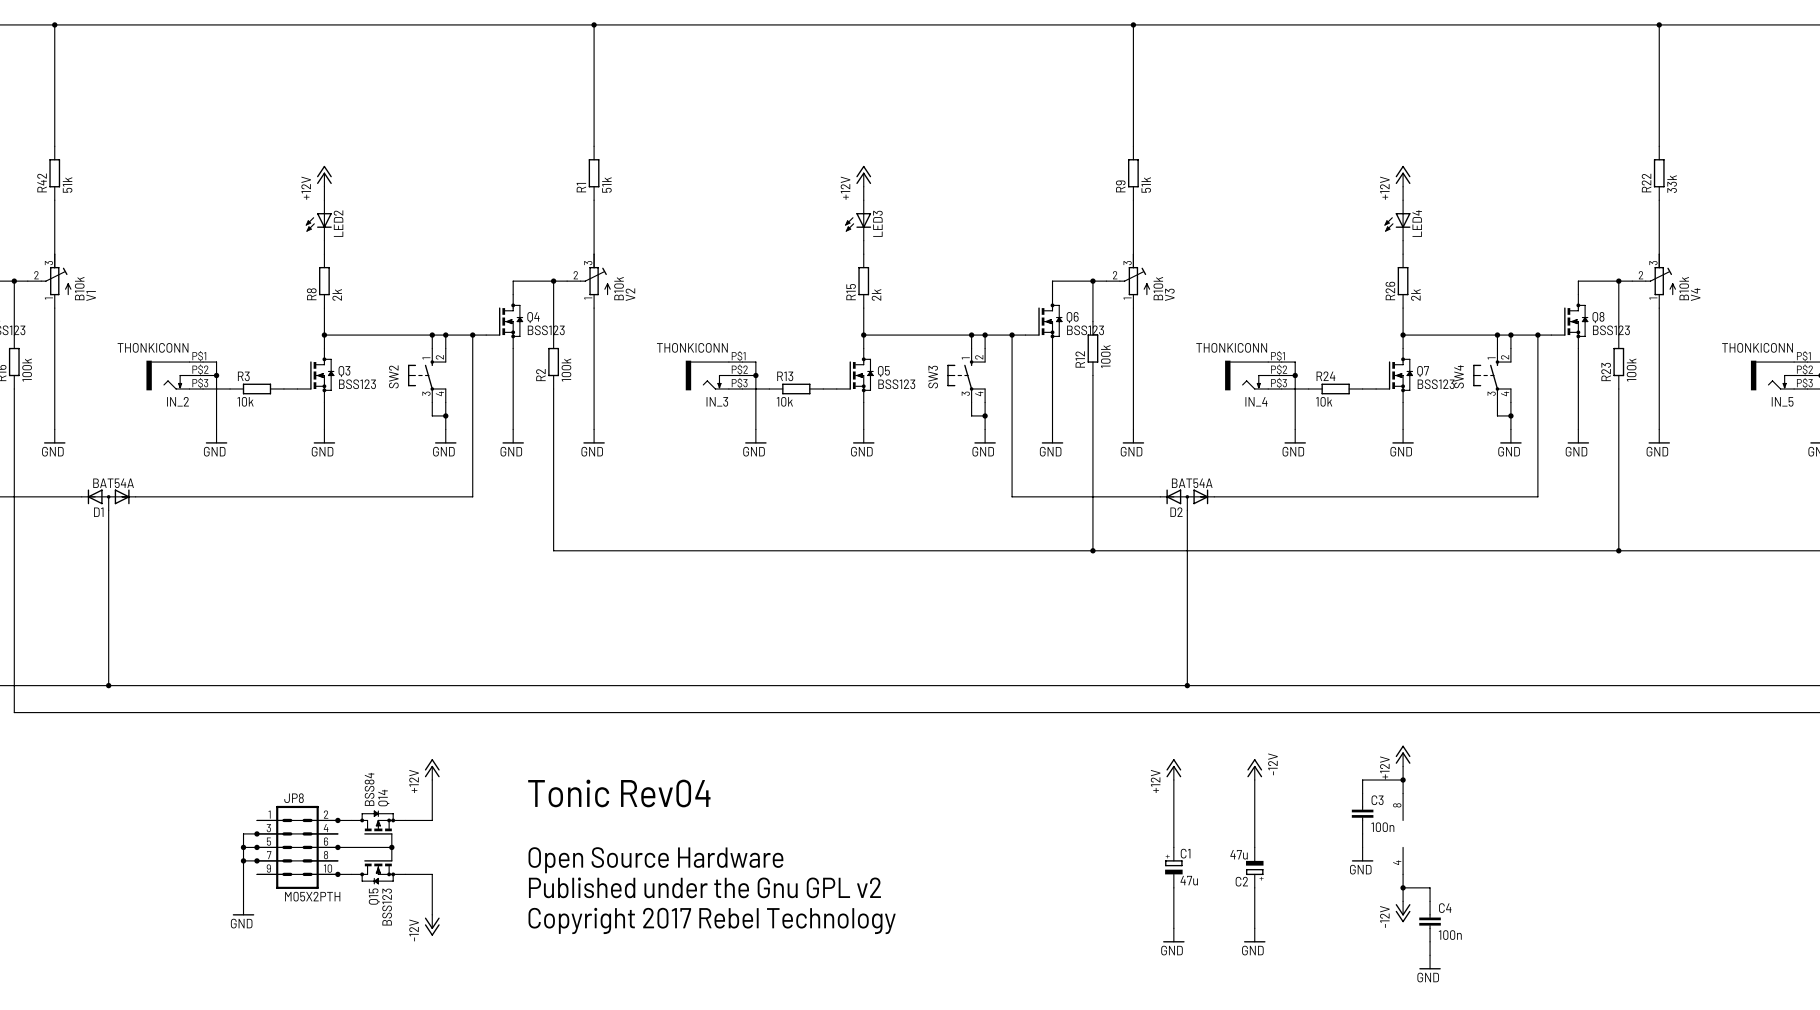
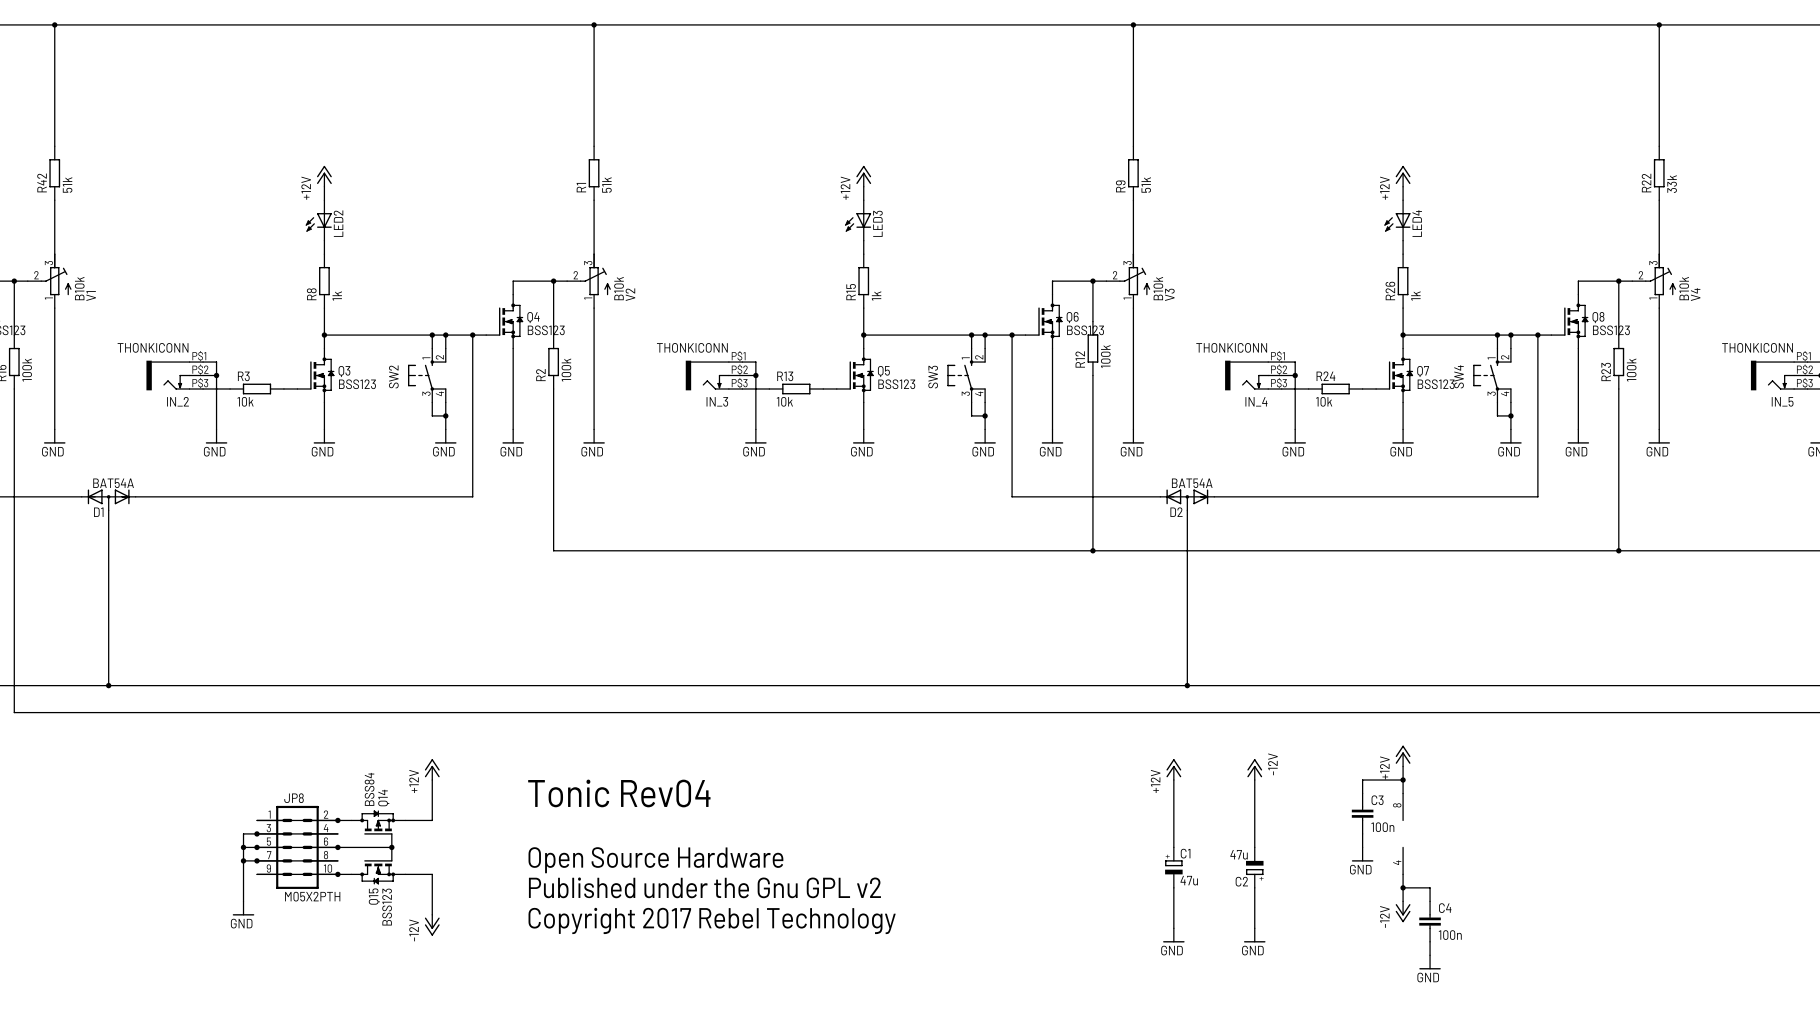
R8 value: 2k (337, 294) -> 1k (337, 296)
R15 value: 2k (876, 294) -> 1k (876, 296)
R26 value: 2k (1415, 294) -> 1k (1415, 296)

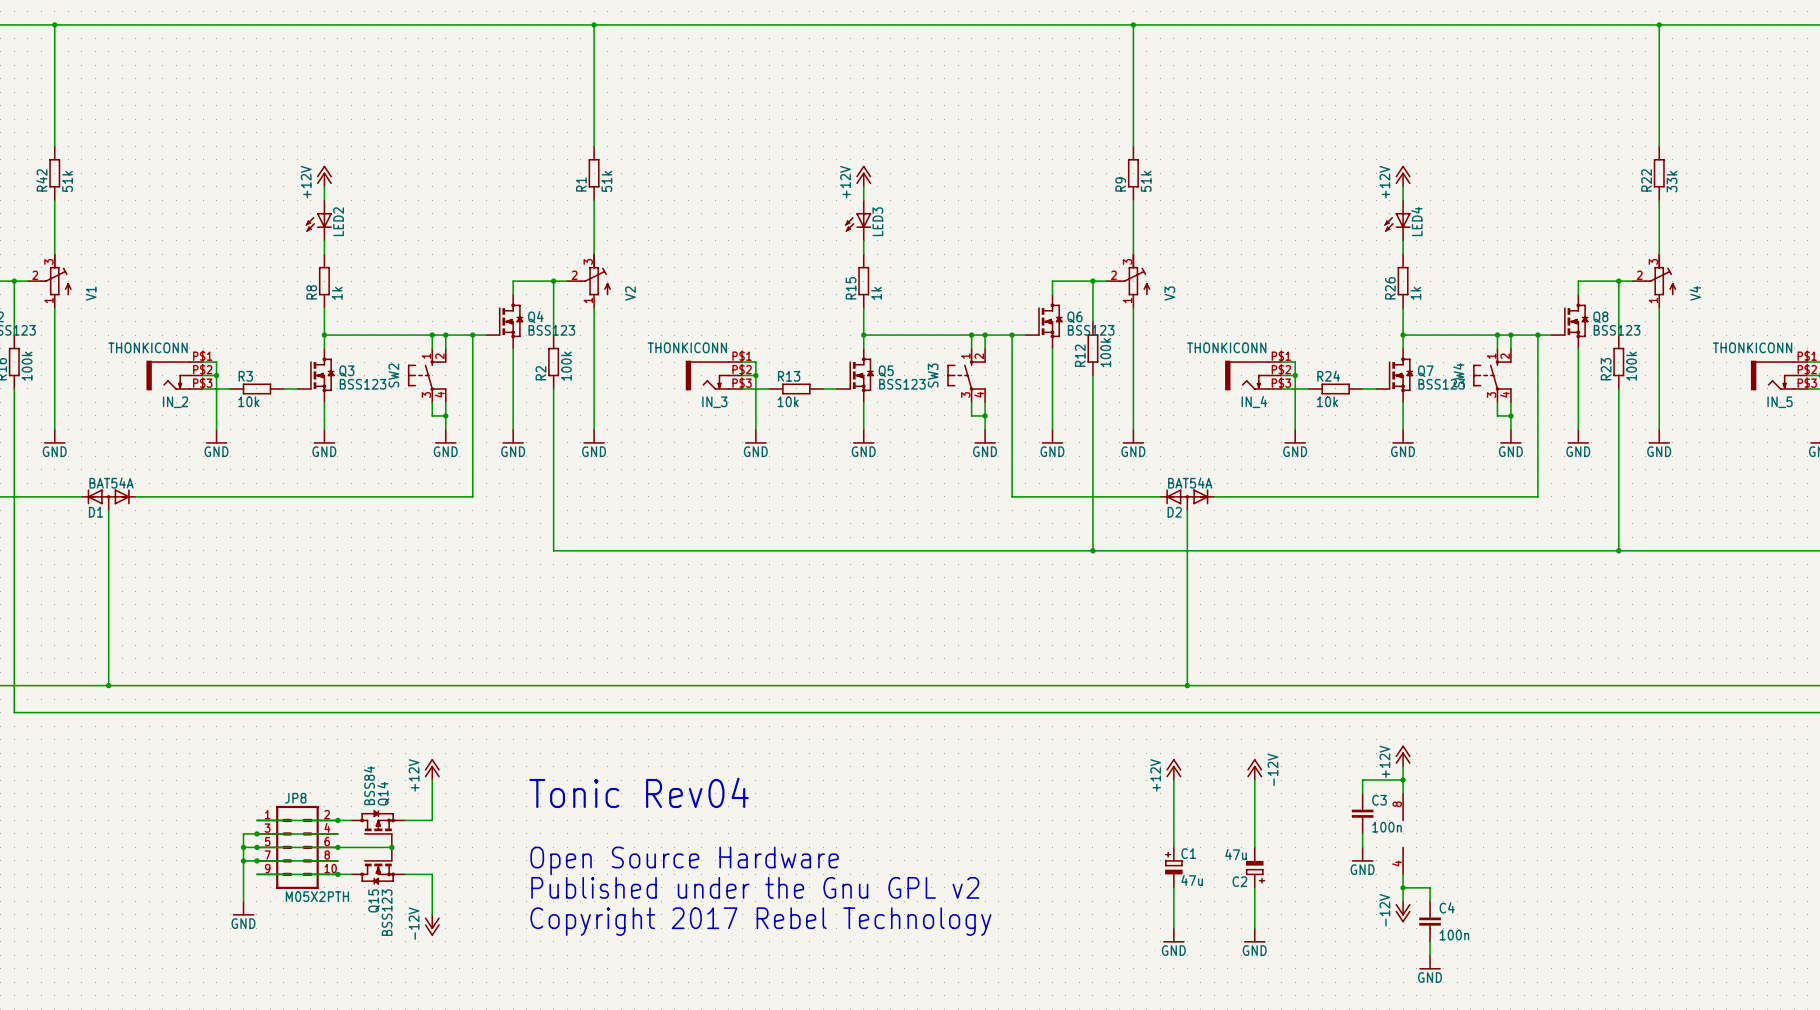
V1 value: B10k (79, 288) -> none
V2 value: B10k (619, 288) -> none
V3 value: B10k (1158, 288) -> none
V4 value: B10k (1684, 288) -> none

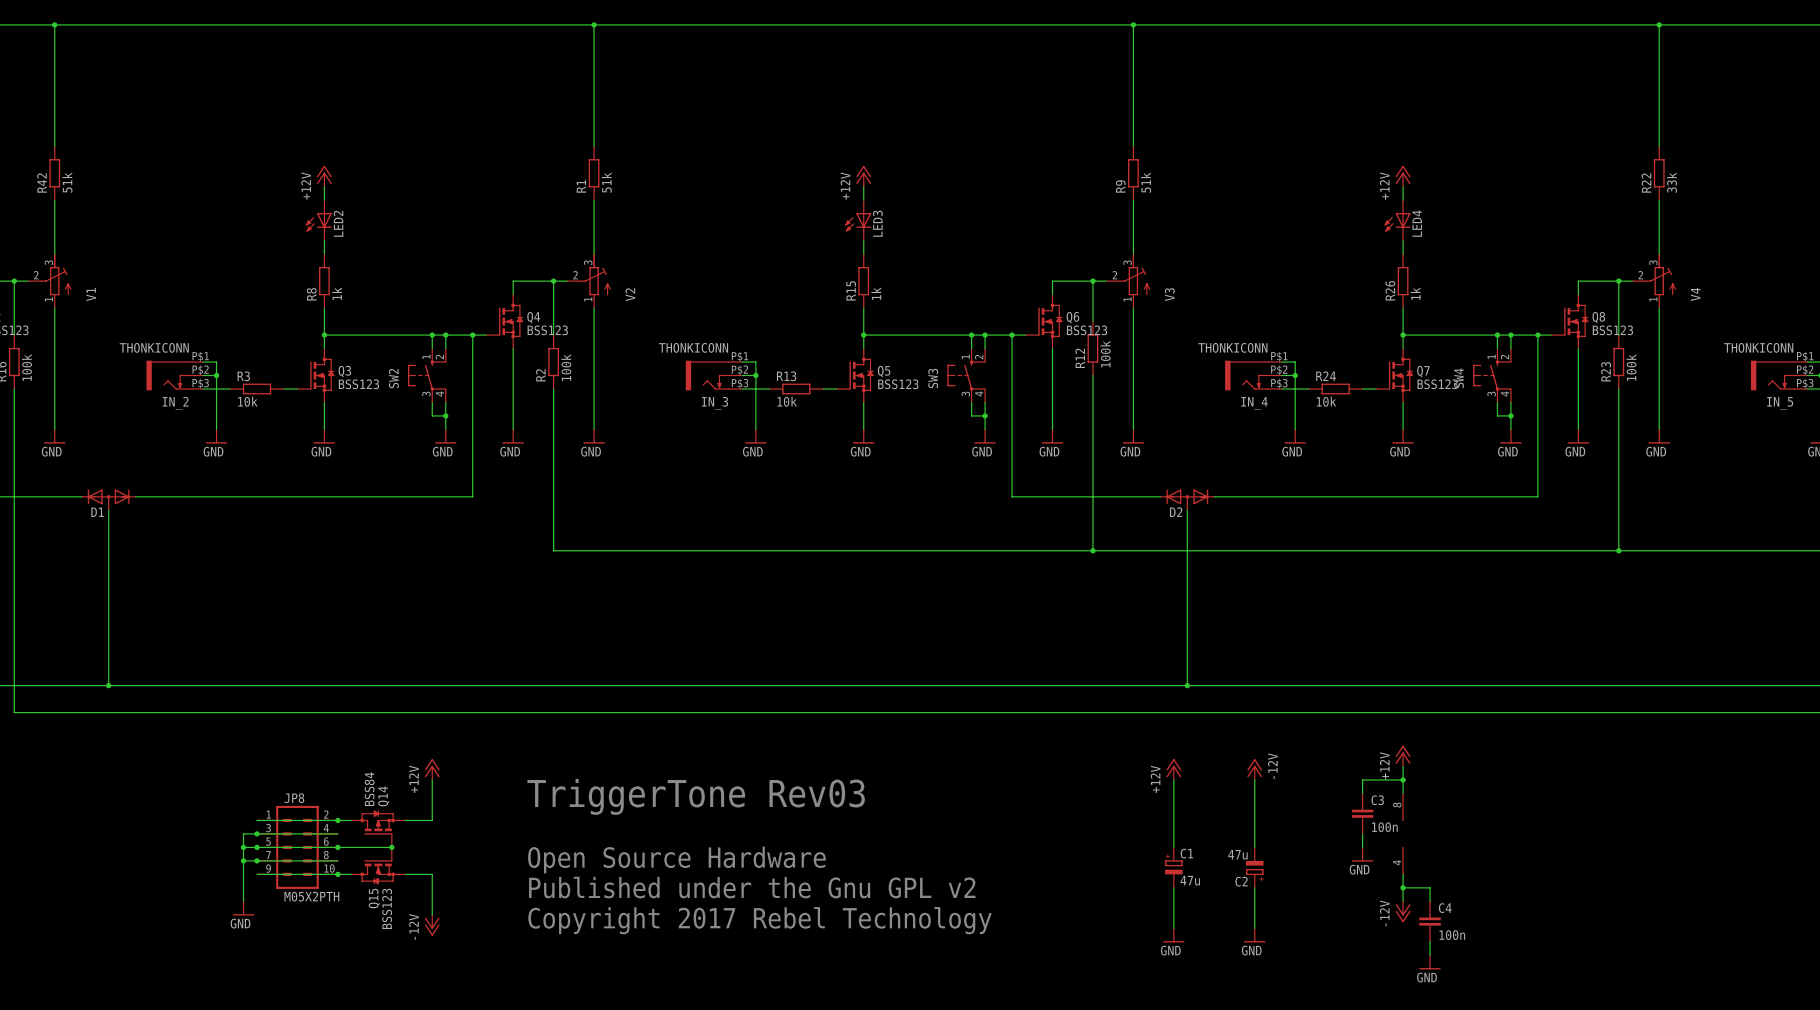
D1 value: BAT54A (111, 483) -> none
D2 value: BAT54A (1190, 483) -> none
text: Tonic Rev04 (639, 792) -> TriggerTone Rev03 (696, 796)

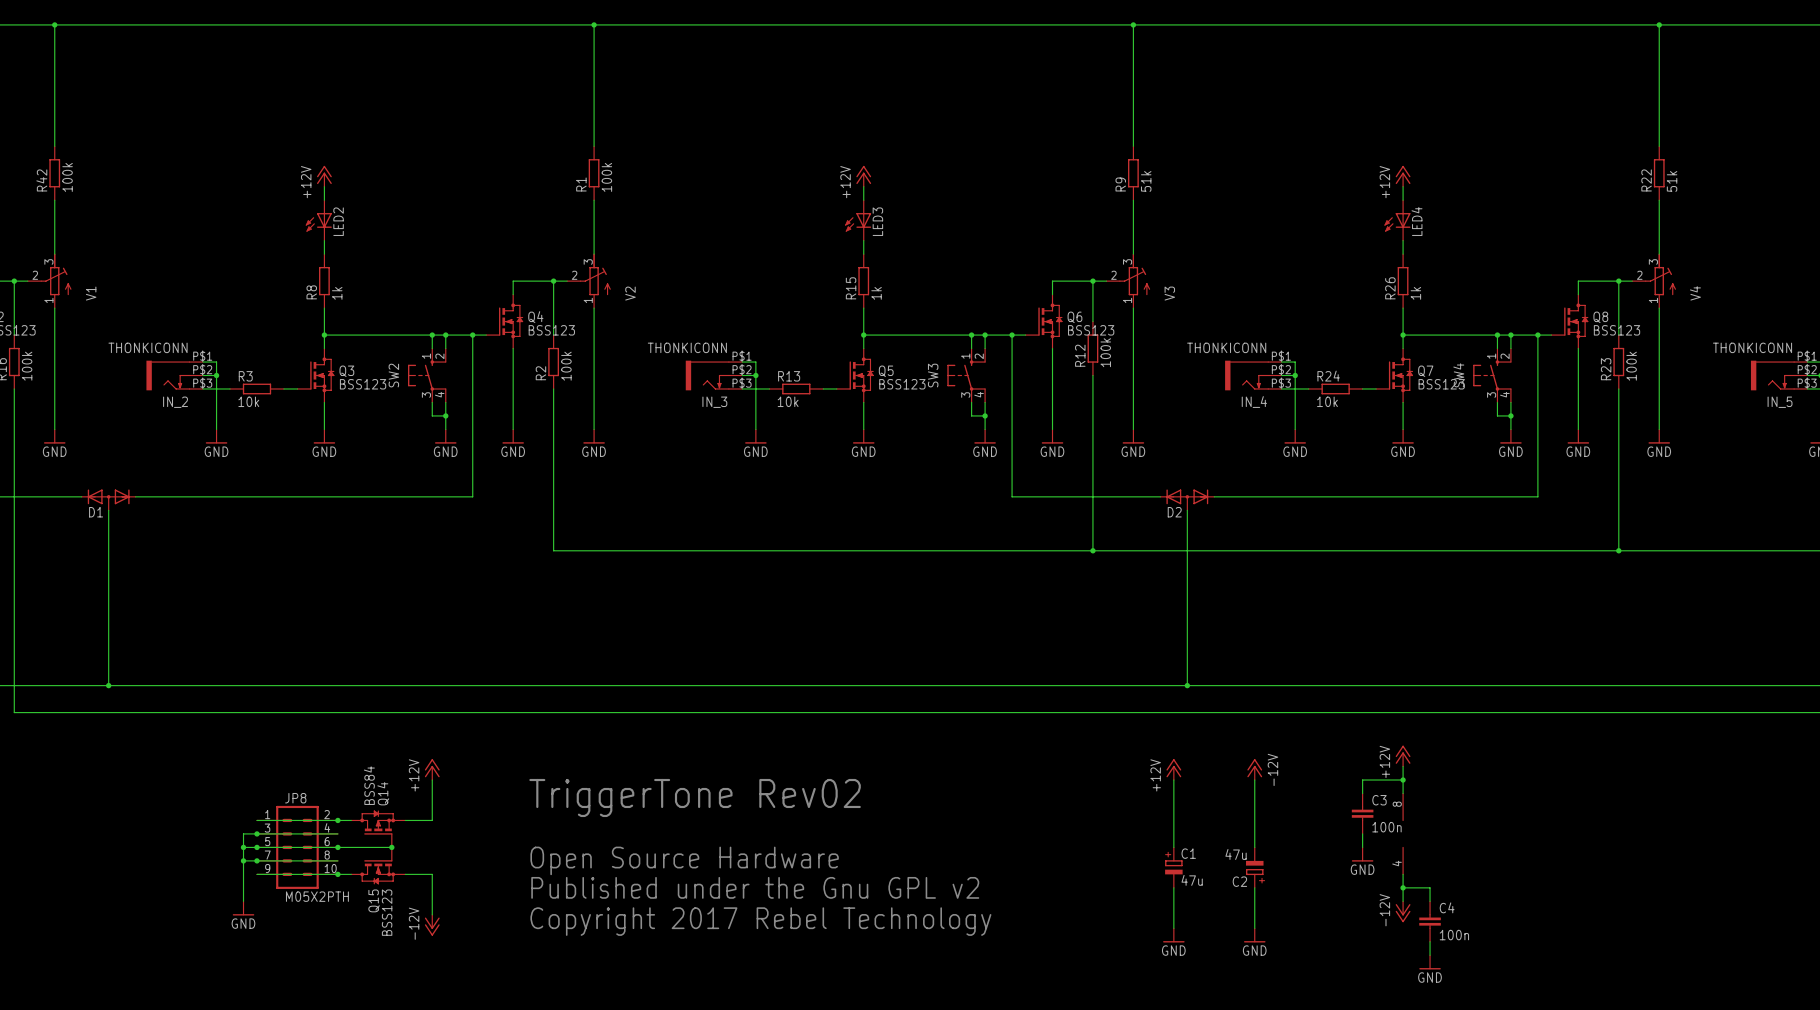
R42 value: 51k (67, 182) -> 100k (67, 177)
R1 value: 51k (606, 182) -> 100k (606, 177)
R22 value: 33k (1671, 182) -> 51k (1672, 181)
text: TriggerTone Rev03 (696, 796) -> TriggerTone Rev02 (695, 797)

